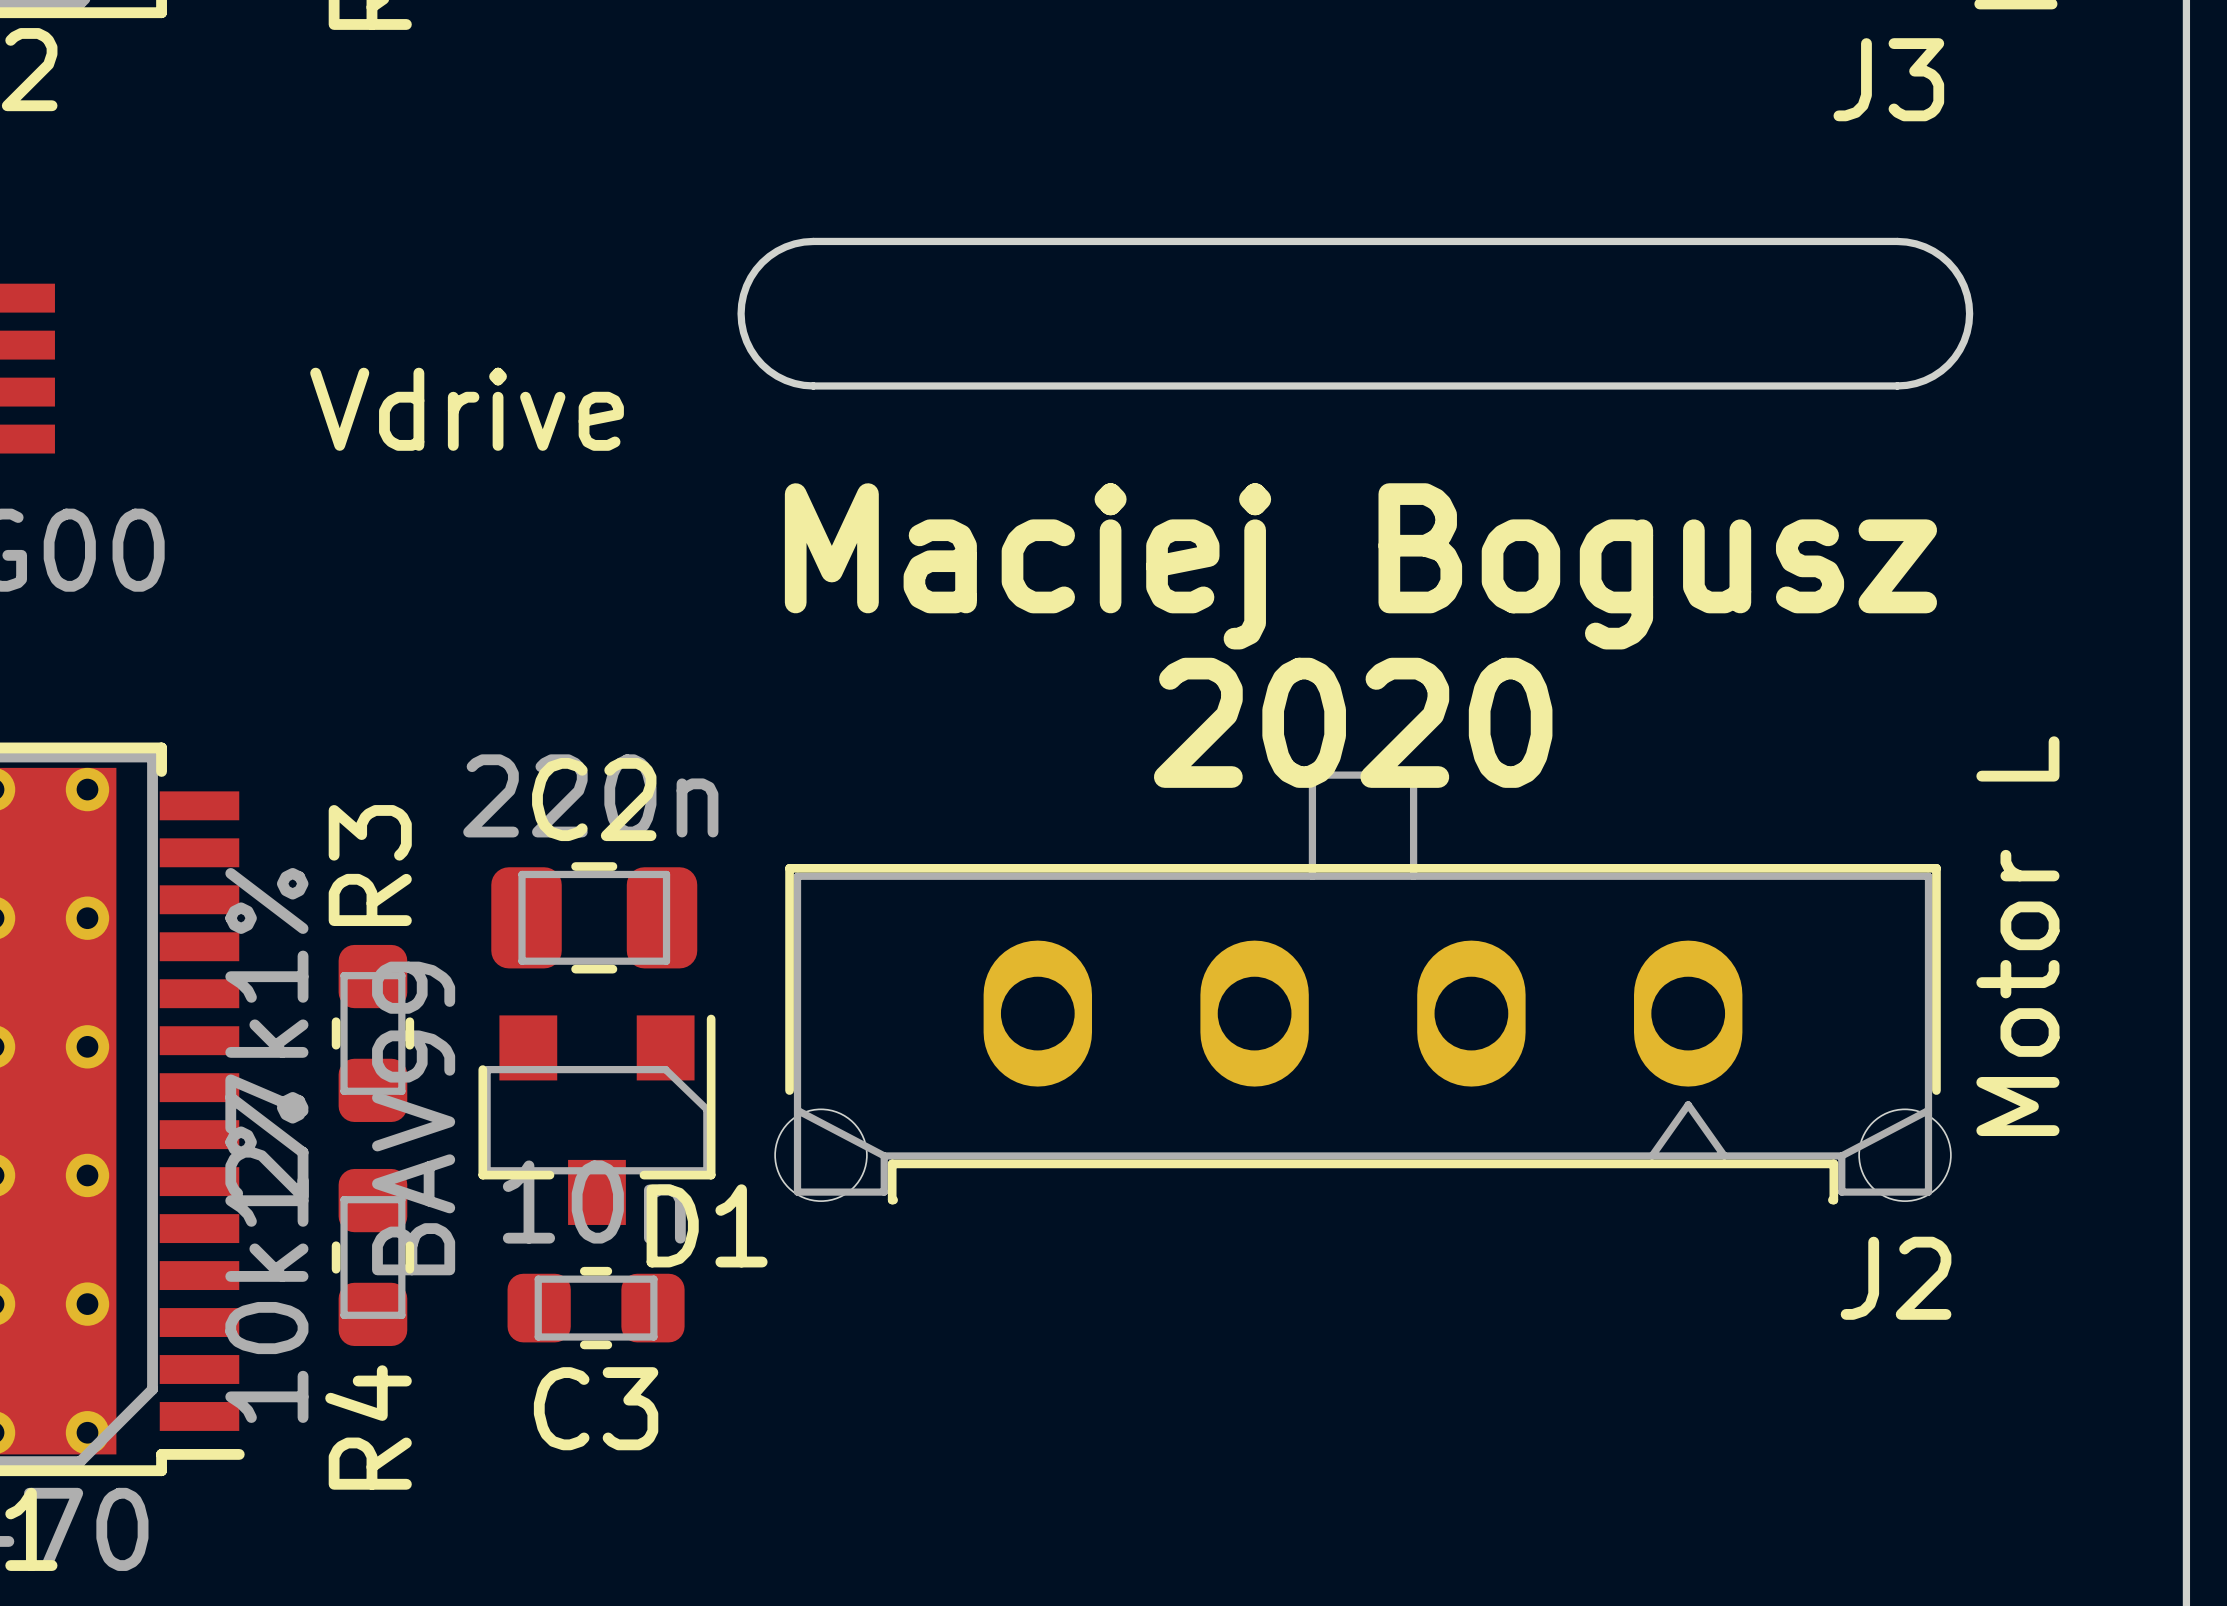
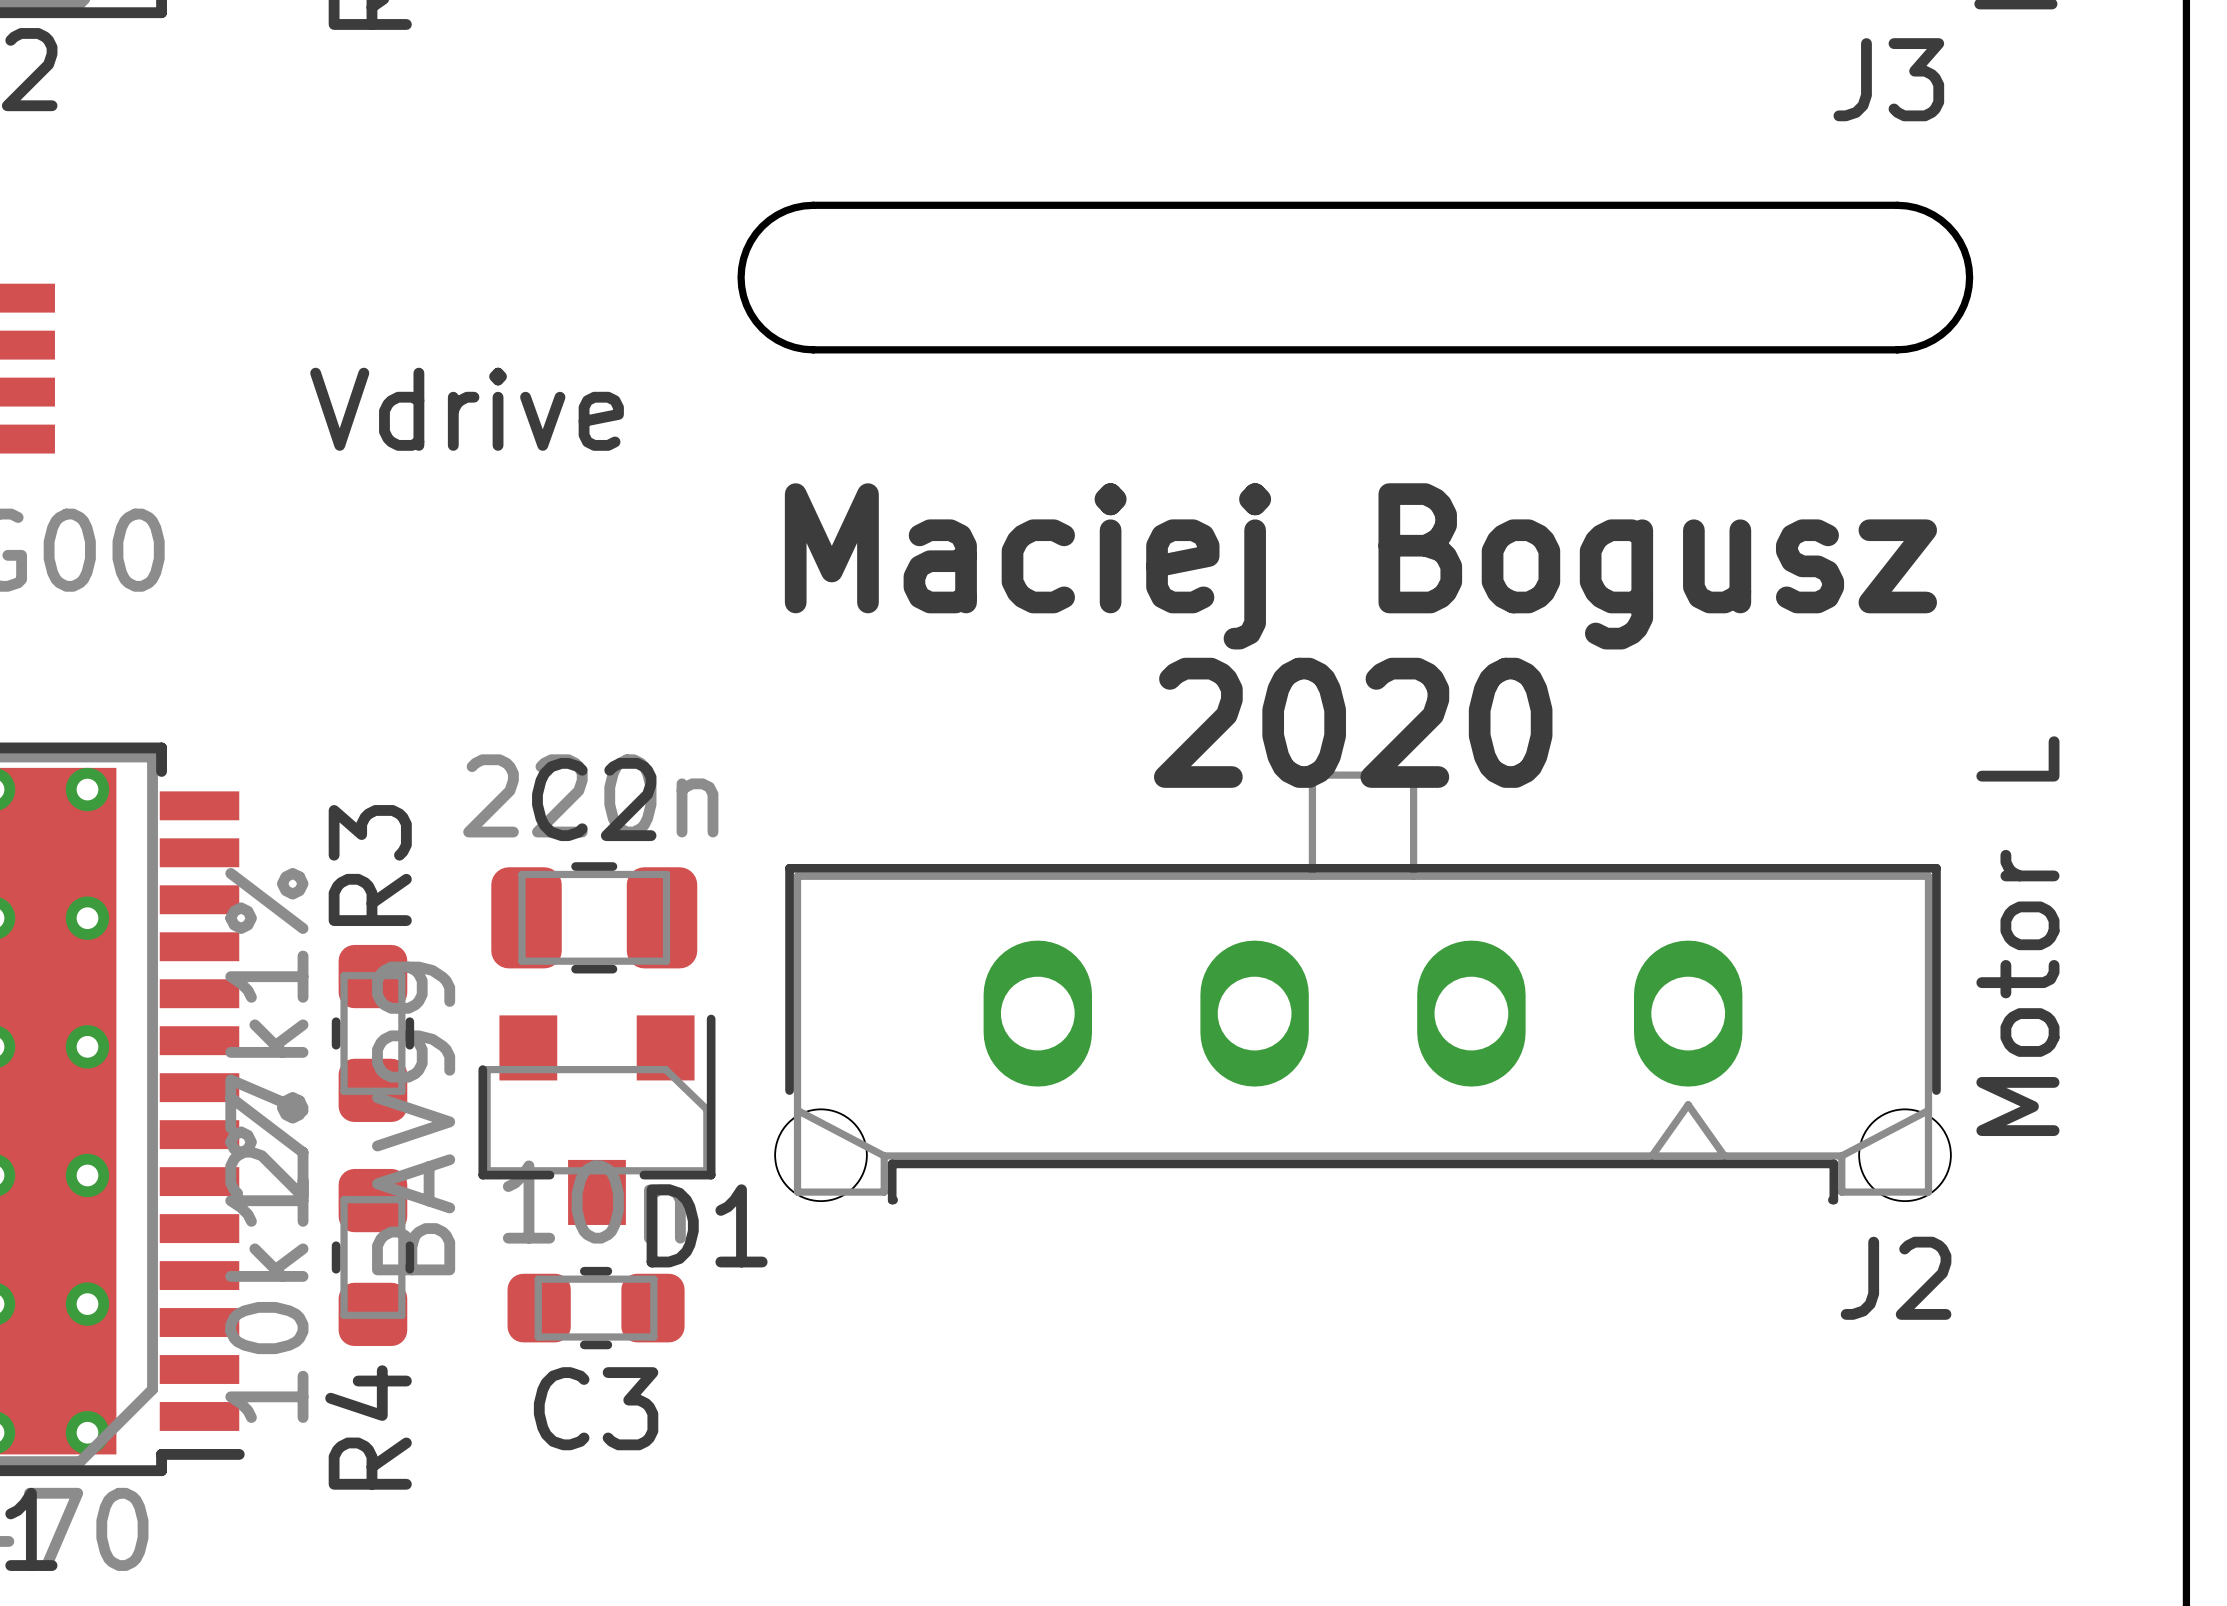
board edge: (813, 241) (1906, 242) (1933, 251) (1954, 269) (1967, 295) (1969, 323) (1959, 349) (1941, 371) (1925, 380) (1897, 385) (803, 385) (785, 380) (762, 364) (746, 341) (741, 313) (746, 286) (762, 262) (785, 246) (813, 241) -> (813, 205) (1906, 205) (1933, 214) (1954, 233) (1967, 258) (1969, 287) (1959, 313) (1941, 334) (1925, 344) (1897, 349) (803, 349) (785, 344) (762, 328) (746, 305) (741, 277) (746, 249) (762, 226) (785, 210) (813, 205)

